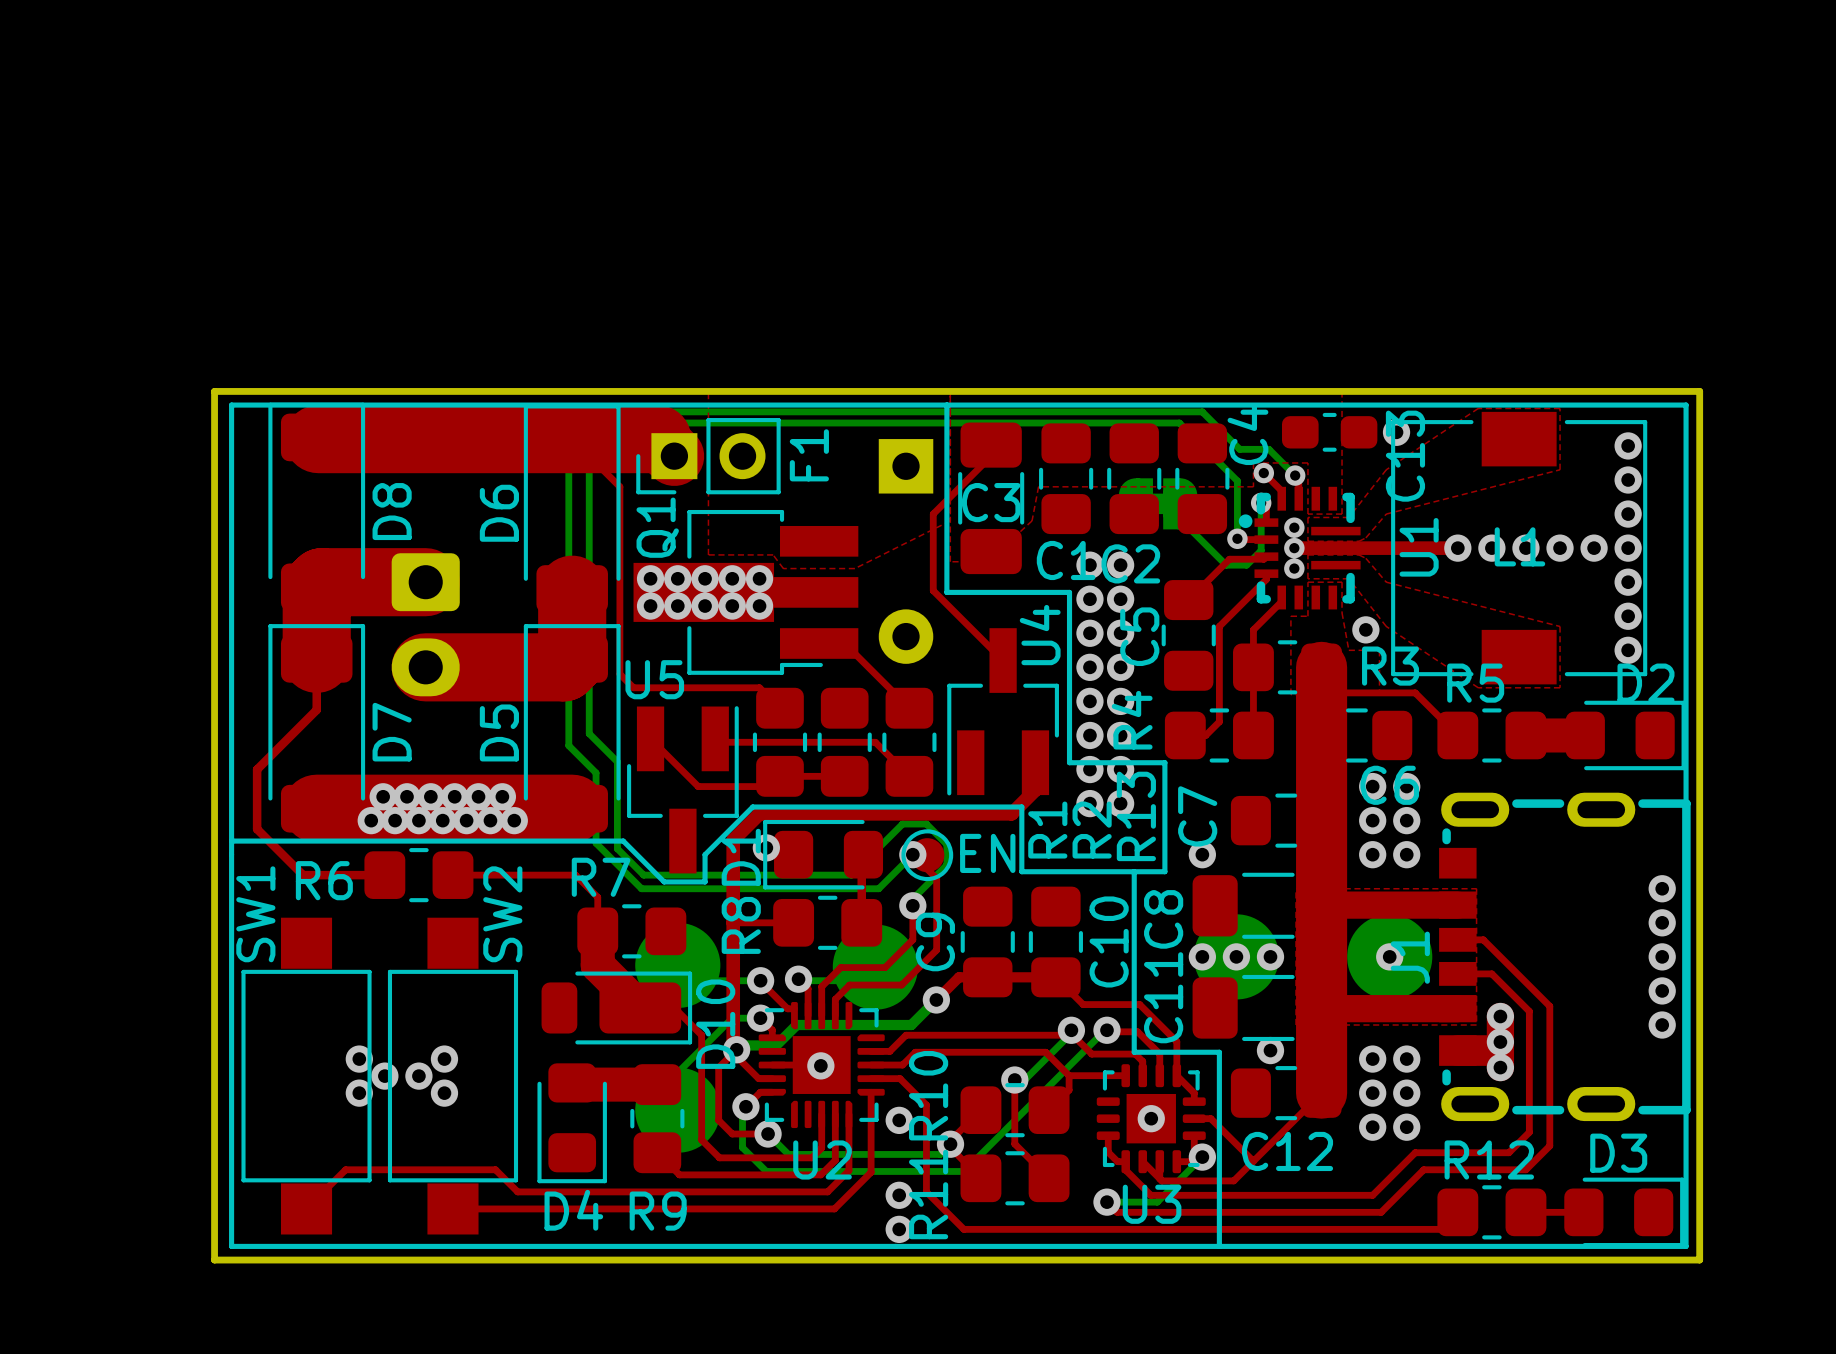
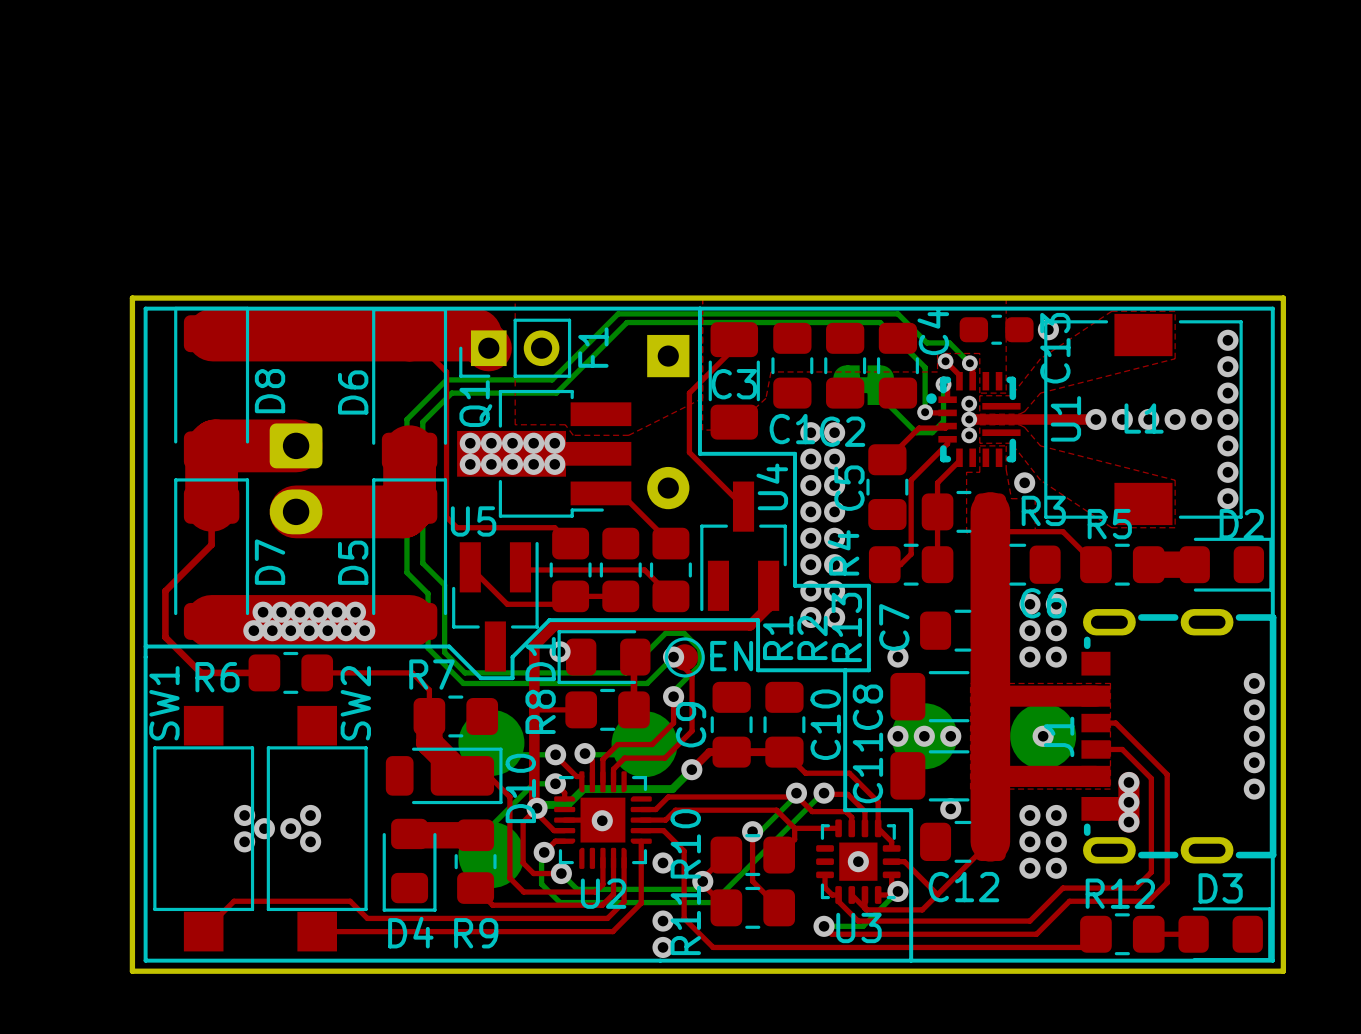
bottom track: (841, 411) (589, 411) (568, 432) (568, 548) -> (618, 313) (552, 379) (446, 379) (406, 419)
bottom track: (852, 423) (610, 423) (589, 444) (589, 551) -> (626, 322) (556, 393) (451, 393) (422, 422)

